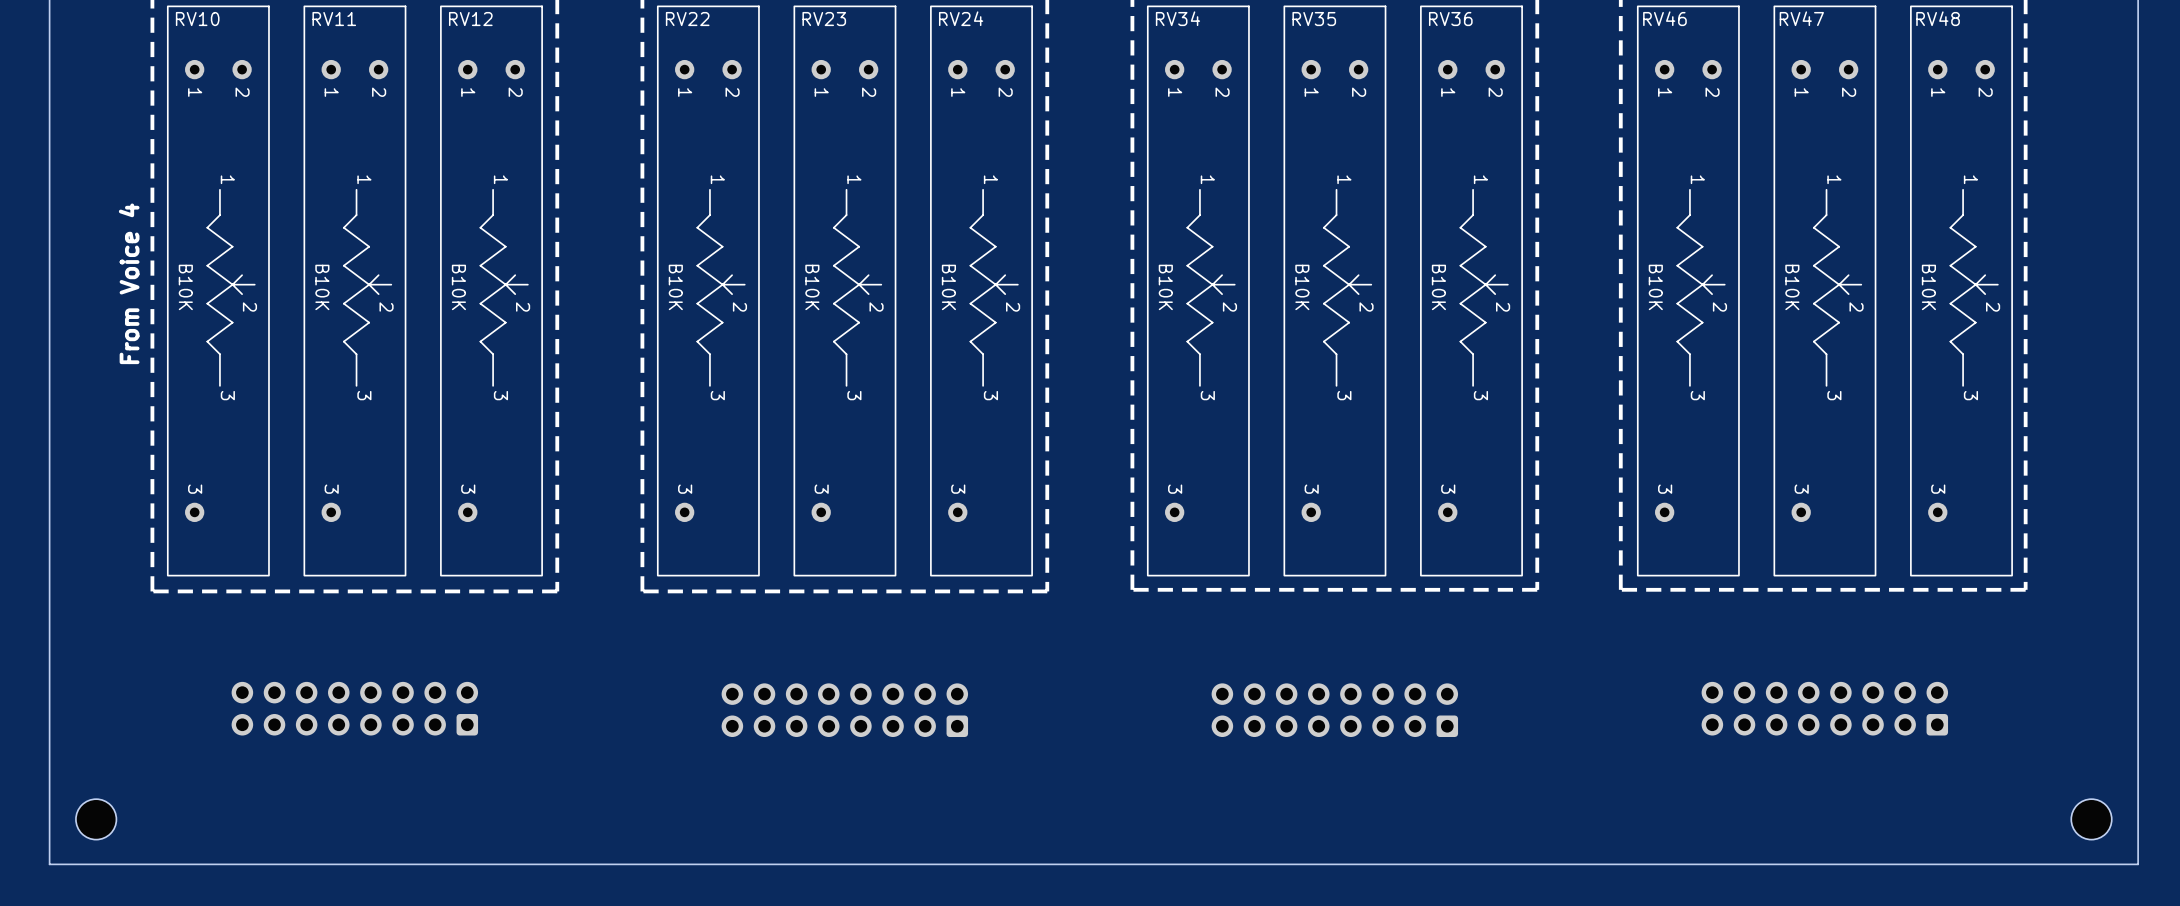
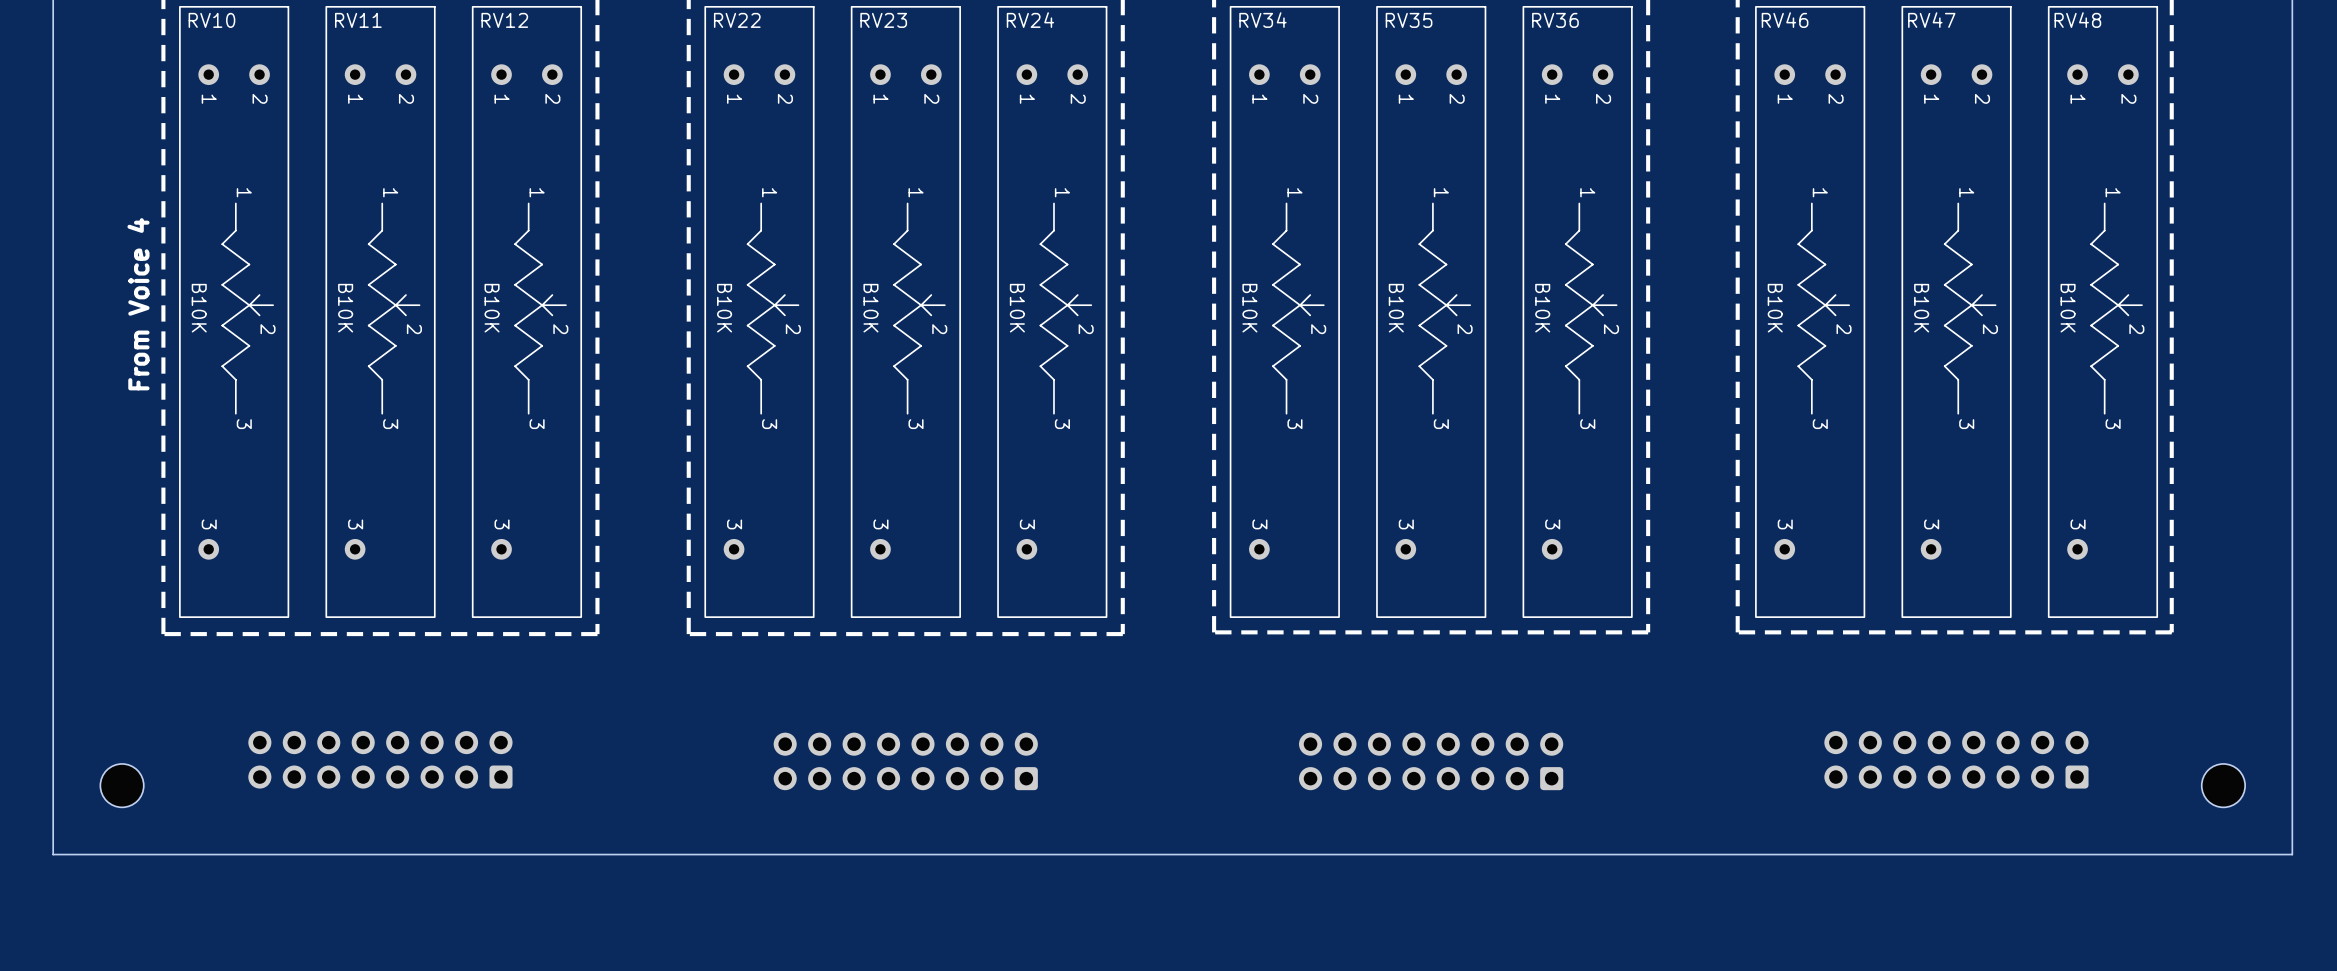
board edge: (49, 797) (49, 864) (2138, 864) (2138, 797) -> (53, 854) (2292, 854)
part position: (96, 819) -> (122, 785)
part position: (2091, 819) -> (2223, 785)

